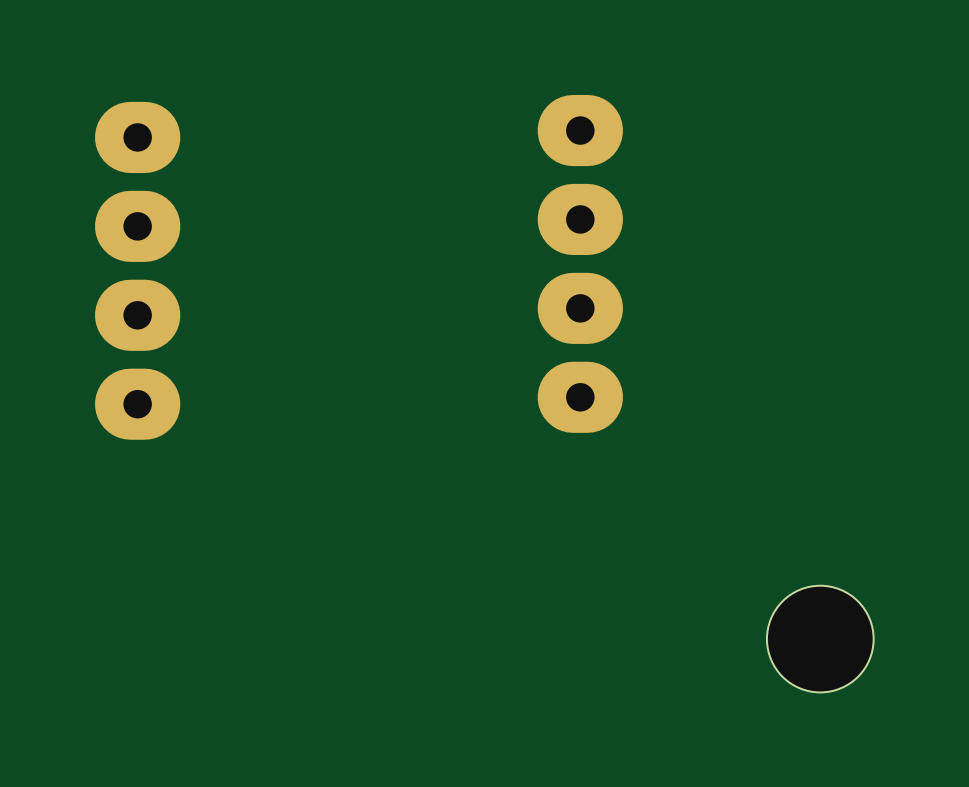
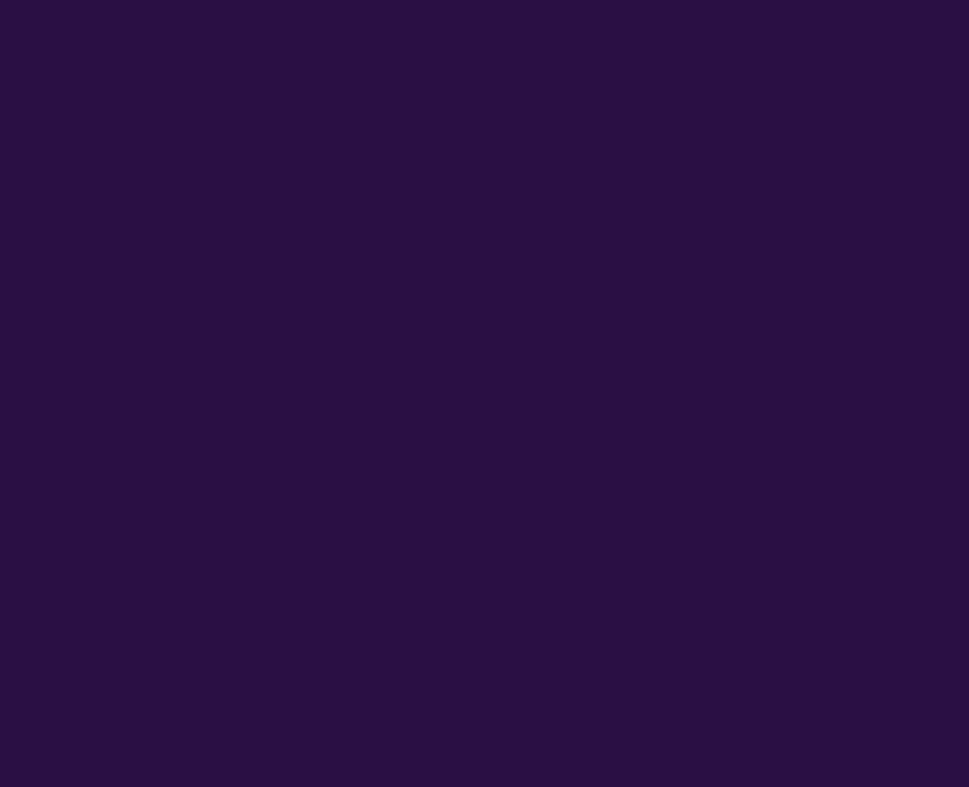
part: (580, 263) -> none
part: (137, 270) -> none
part: (820, 639) -> none

